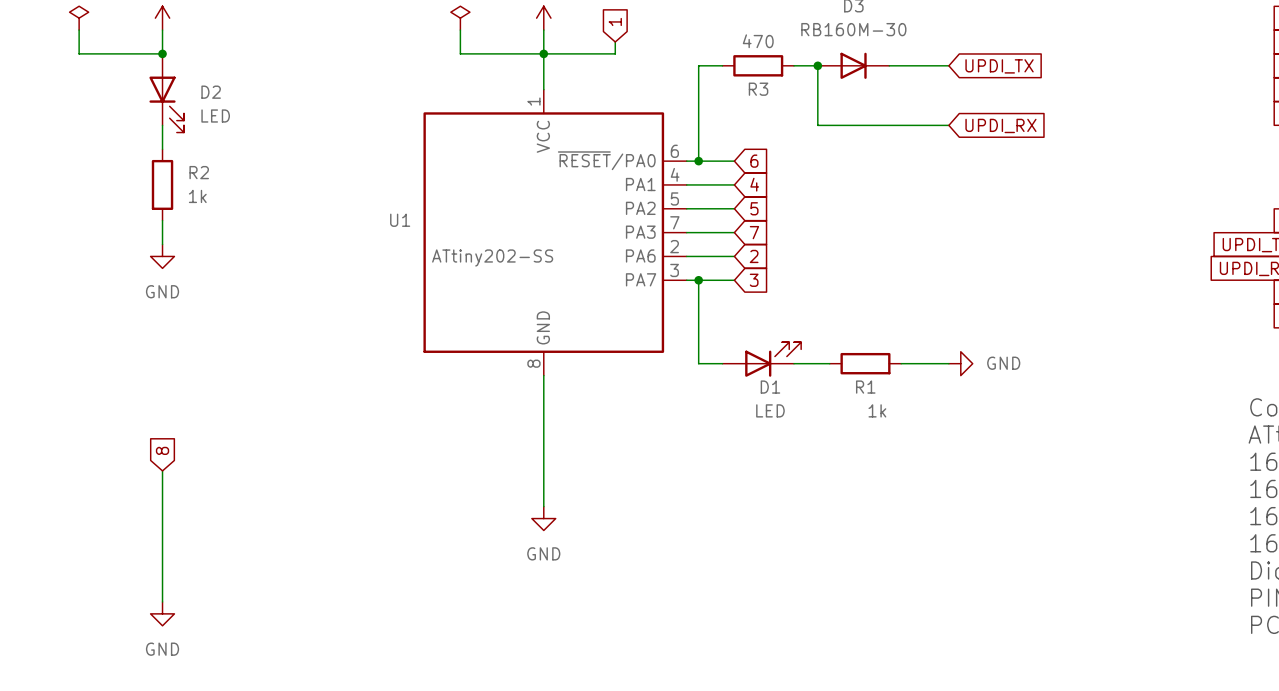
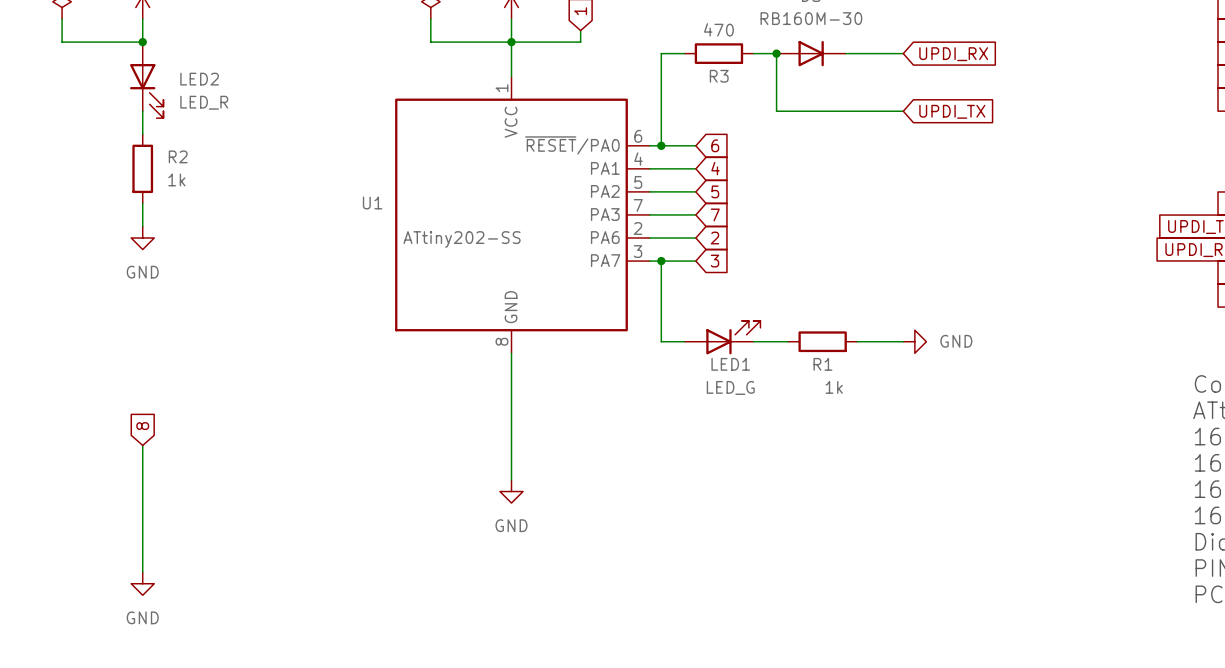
global label: UPDI_TX (999, 66) -> UPDI_RX (953, 54)
D2 name: D2 (211, 92) -> LED2 (199, 79)
D2 value: LED (215, 116) -> LED_R (204, 102)
global label: UPDI_RX (1000, 125) -> UPDI_TX (952, 111)
D1 name: D1 (770, 387) -> LED1 (730, 364)
D1 value: LED (770, 410) -> LED_G (730, 387)

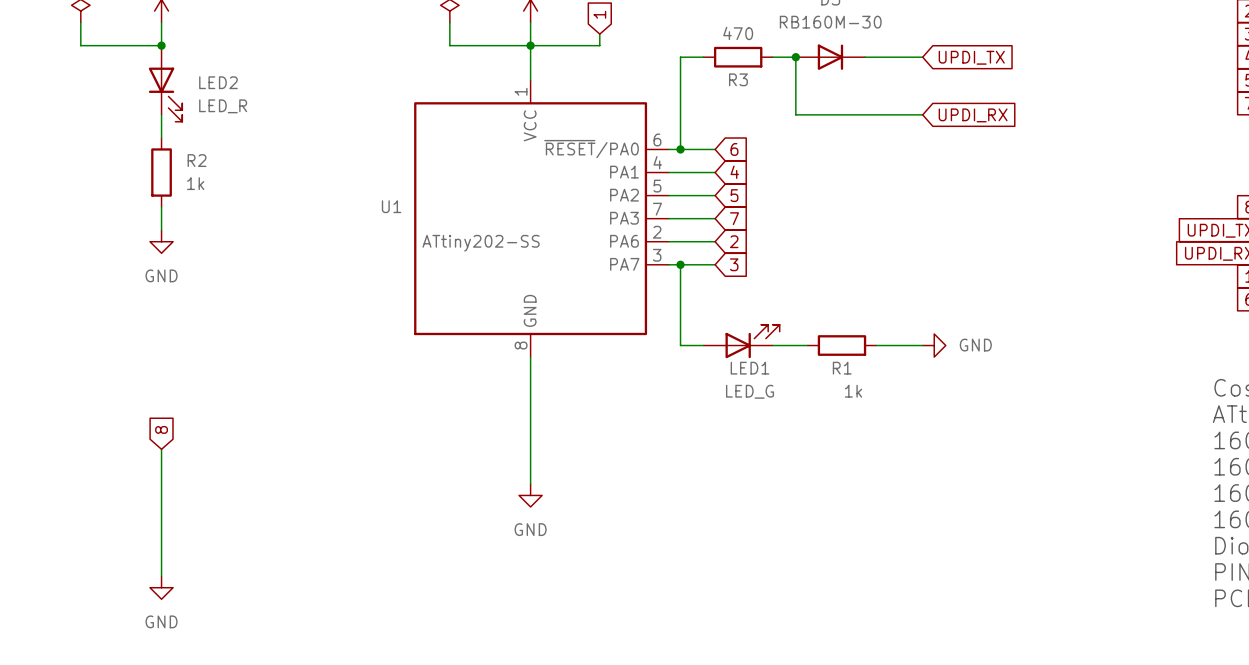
global label: UPDI_RX (953, 54) -> UPDI_TX (971, 57)
global label: UPDI_TX (952, 111) -> UPDI_RX (973, 115)

